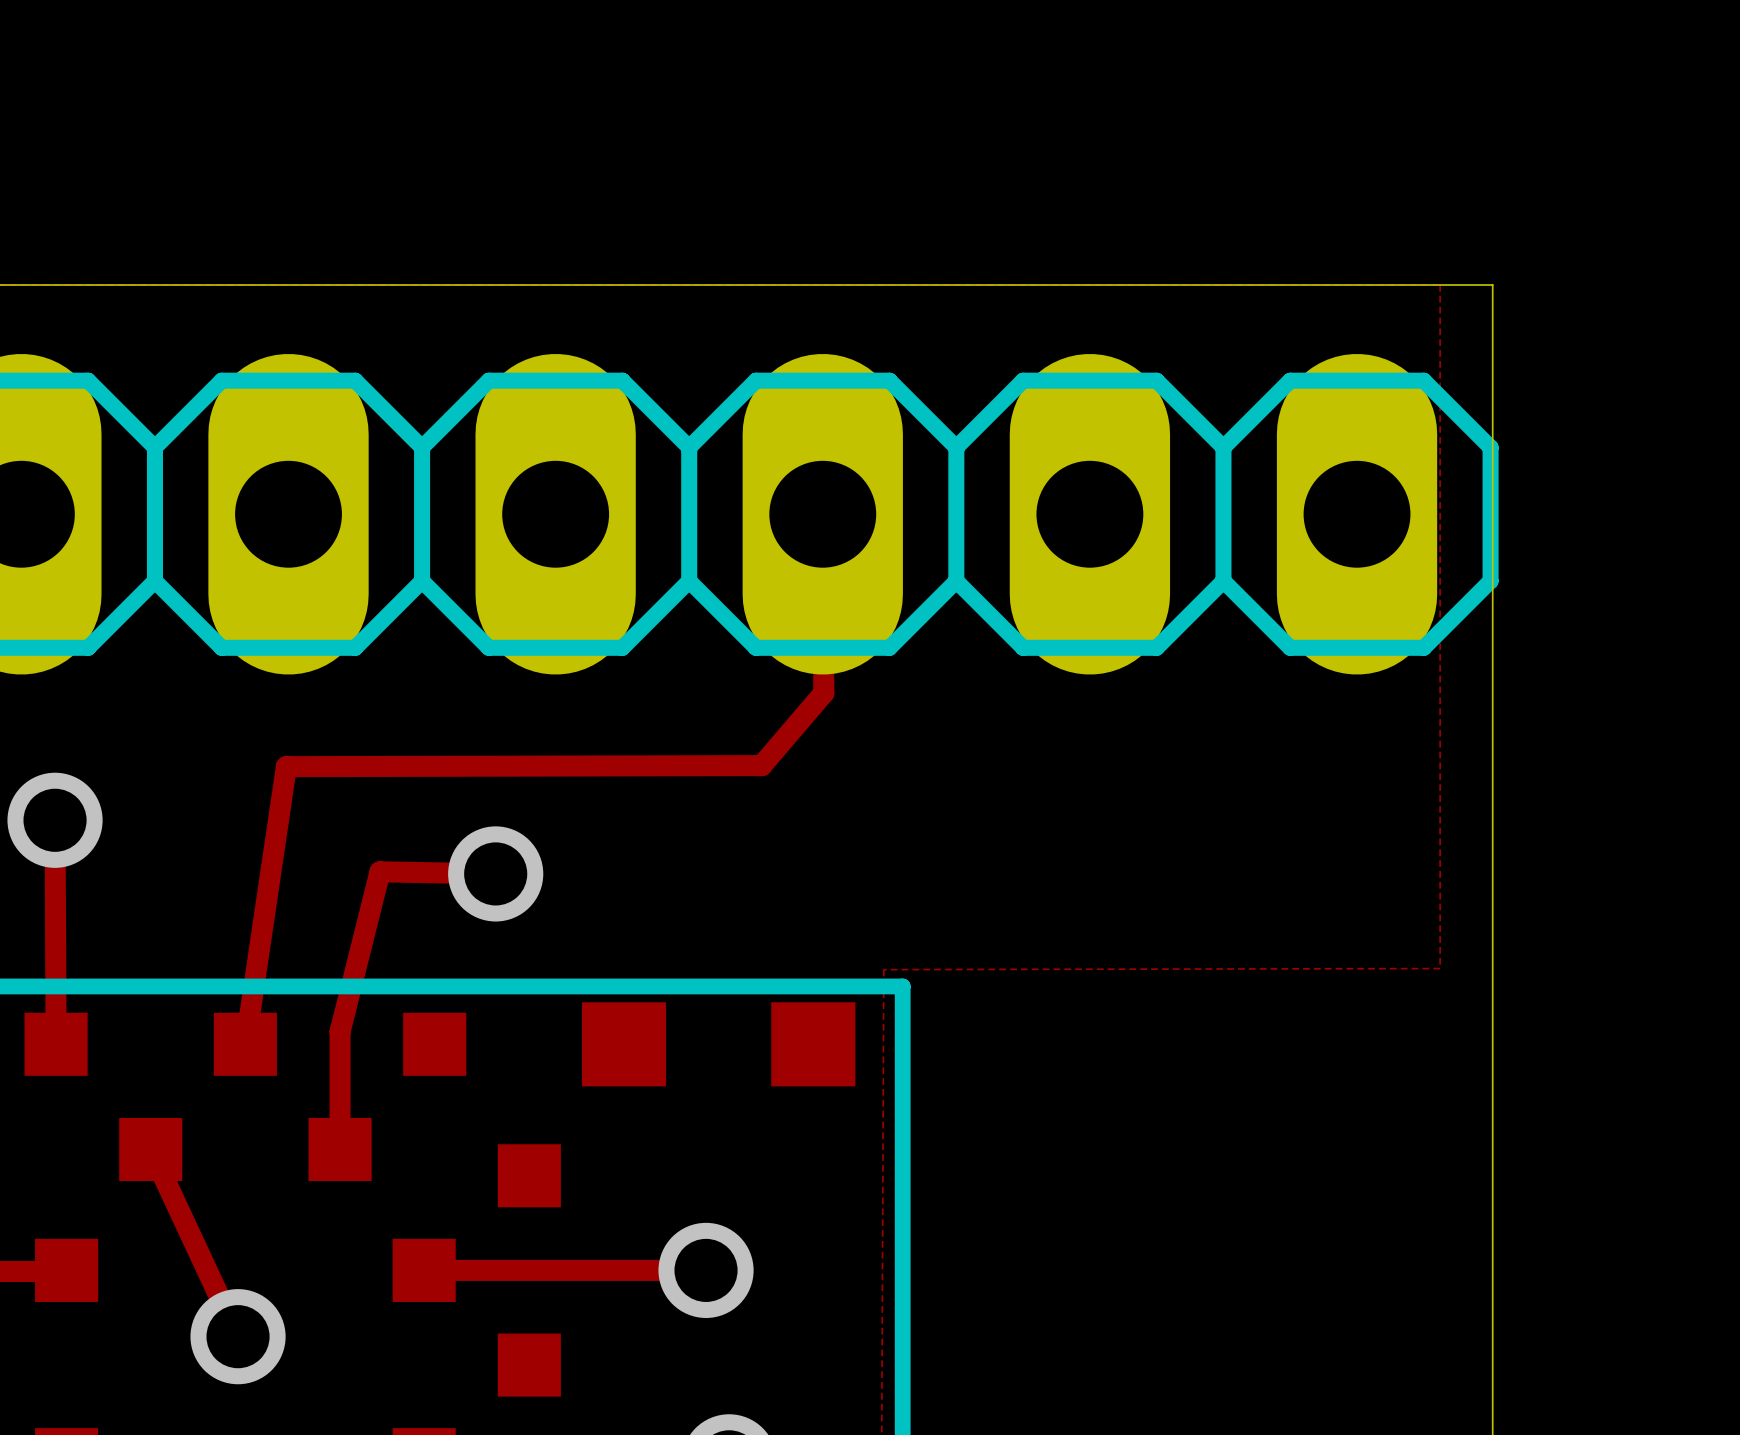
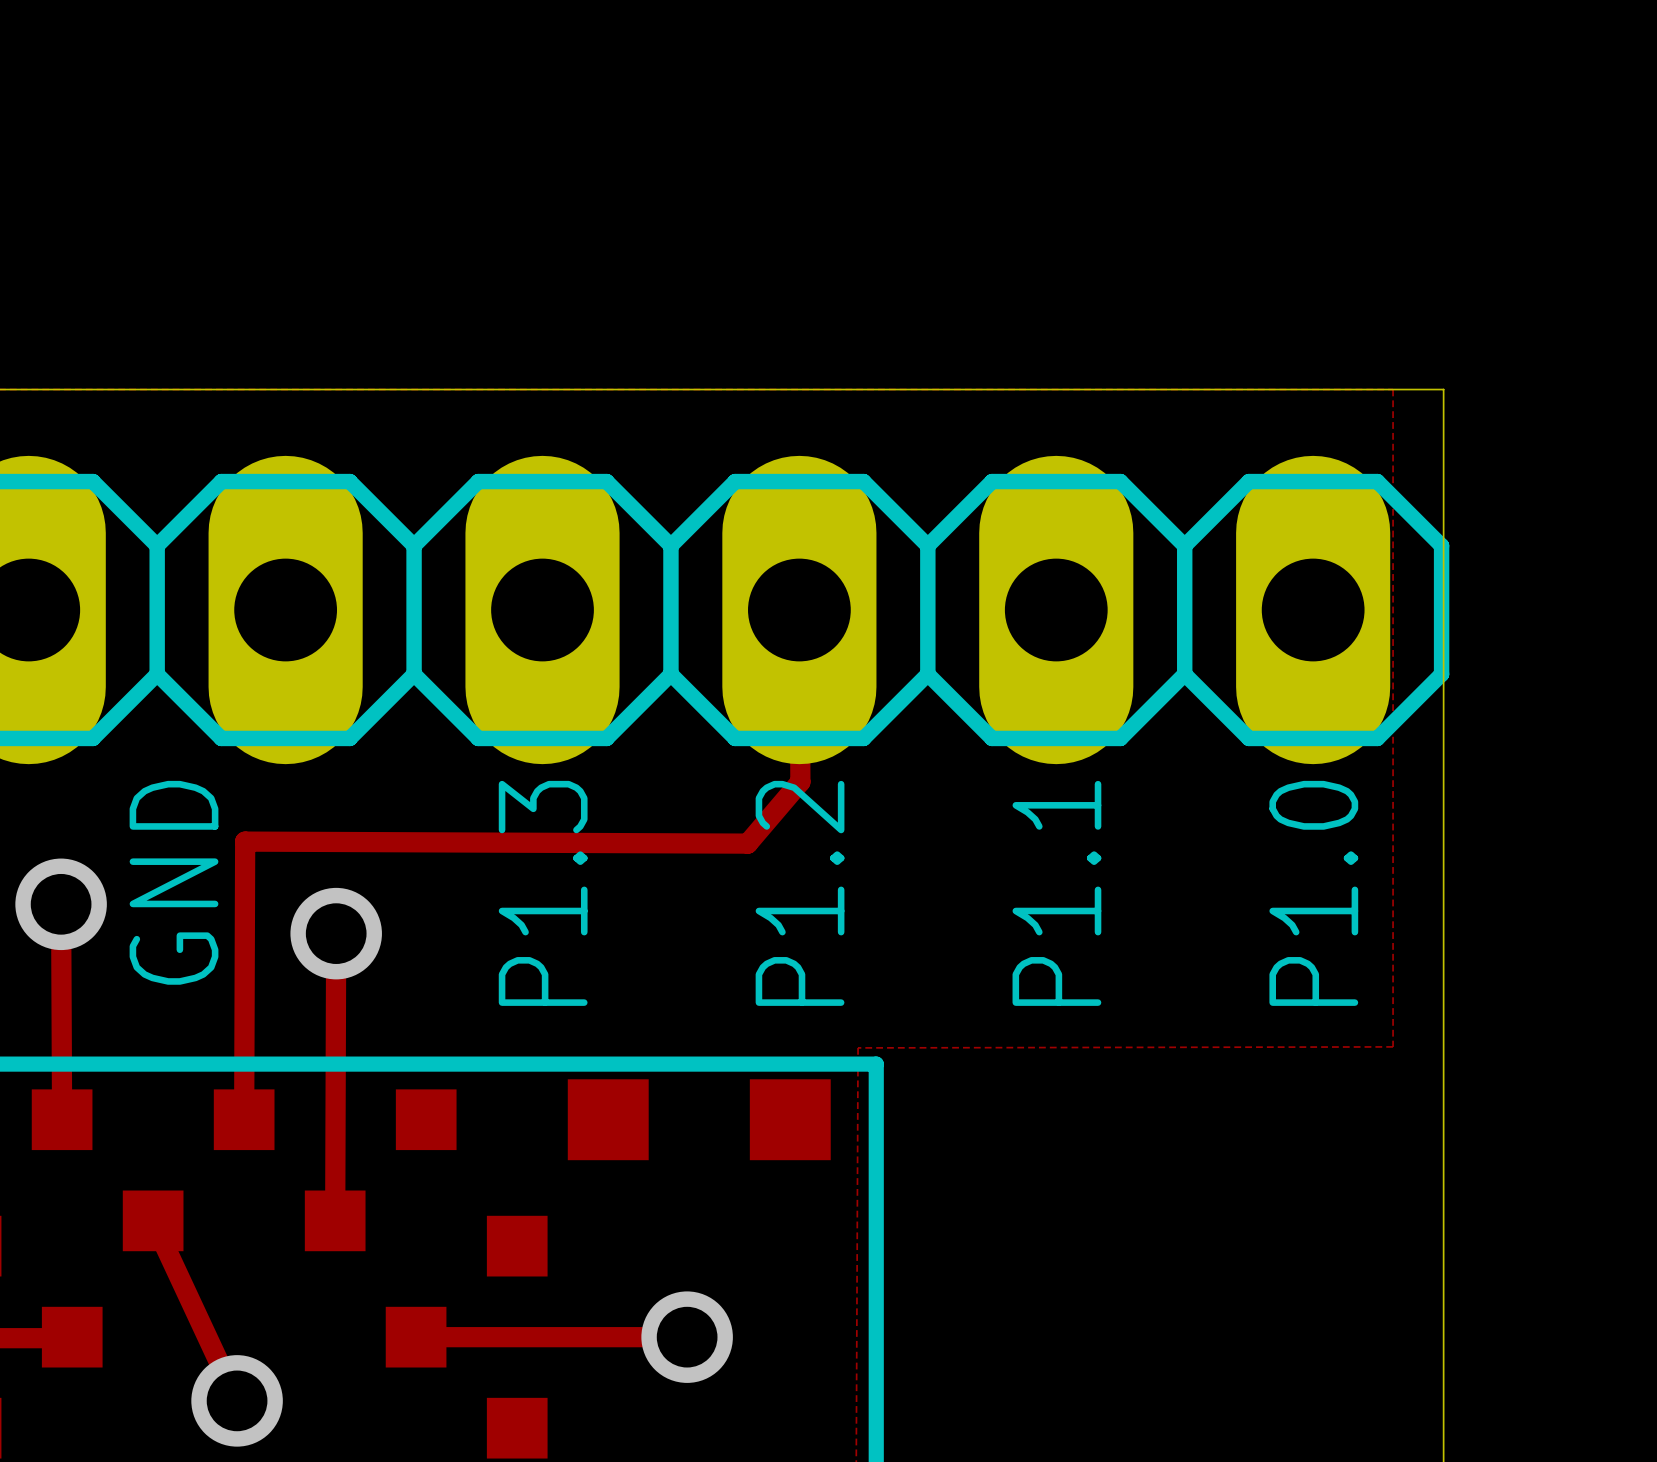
track: (823, 693) (761, 765) (286, 766) (245, 1044) -> (800, 781) (747, 843) (245, 841) (244, 1119)
text: none -> GND (174, 882)
text: none -> P1.3 (543, 893)
text: none -> P1.2 (800, 893)
text: none -> P1.1 (1056, 893)
text: none -> P1.0 (1313, 893)
track: (495, 873) (380, 871) (340, 1031) (340, 1149) -> (336, 933) (335, 1220)
via position: (495, 873) -> (336, 933)

